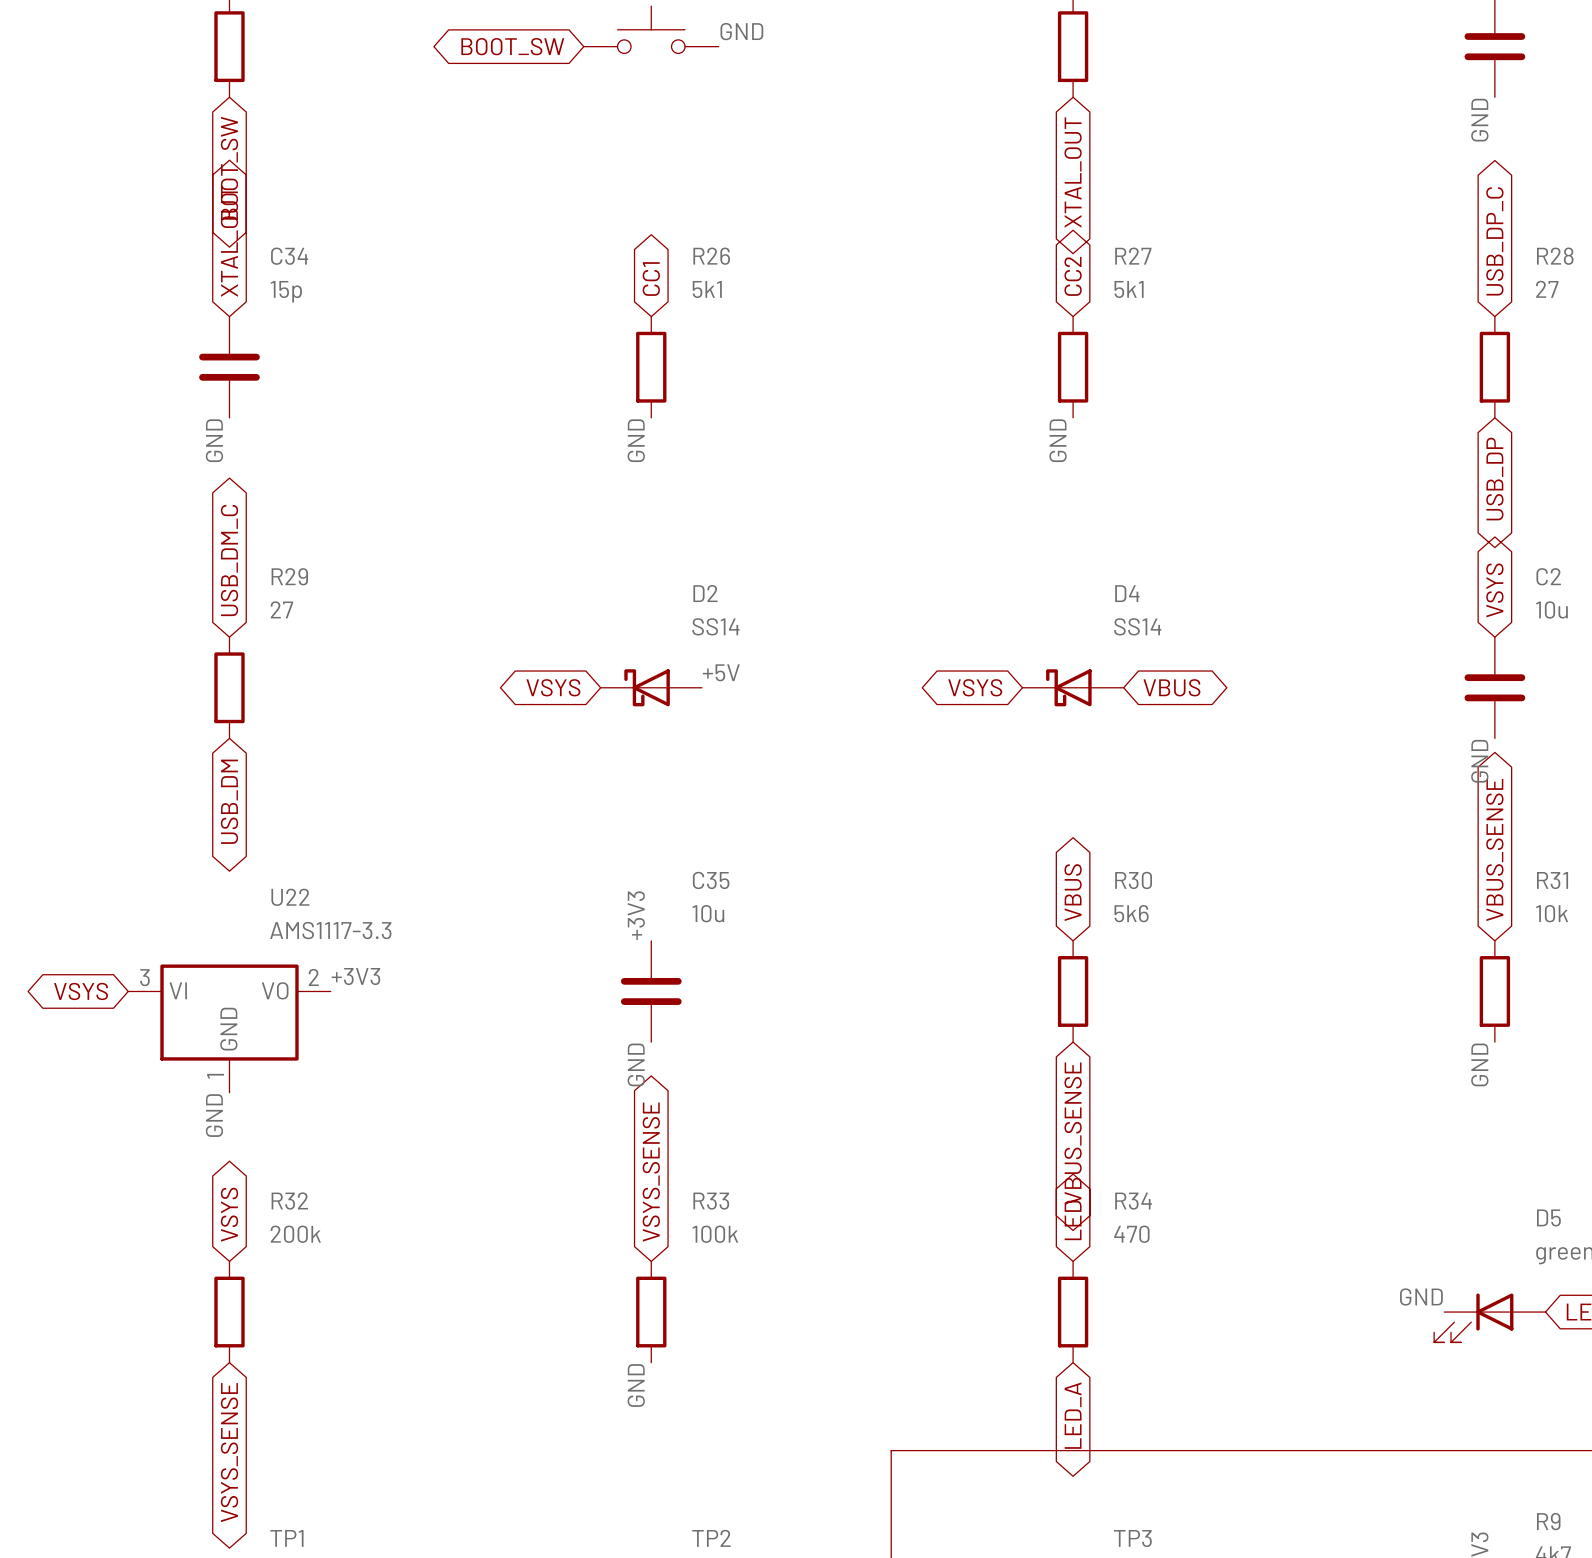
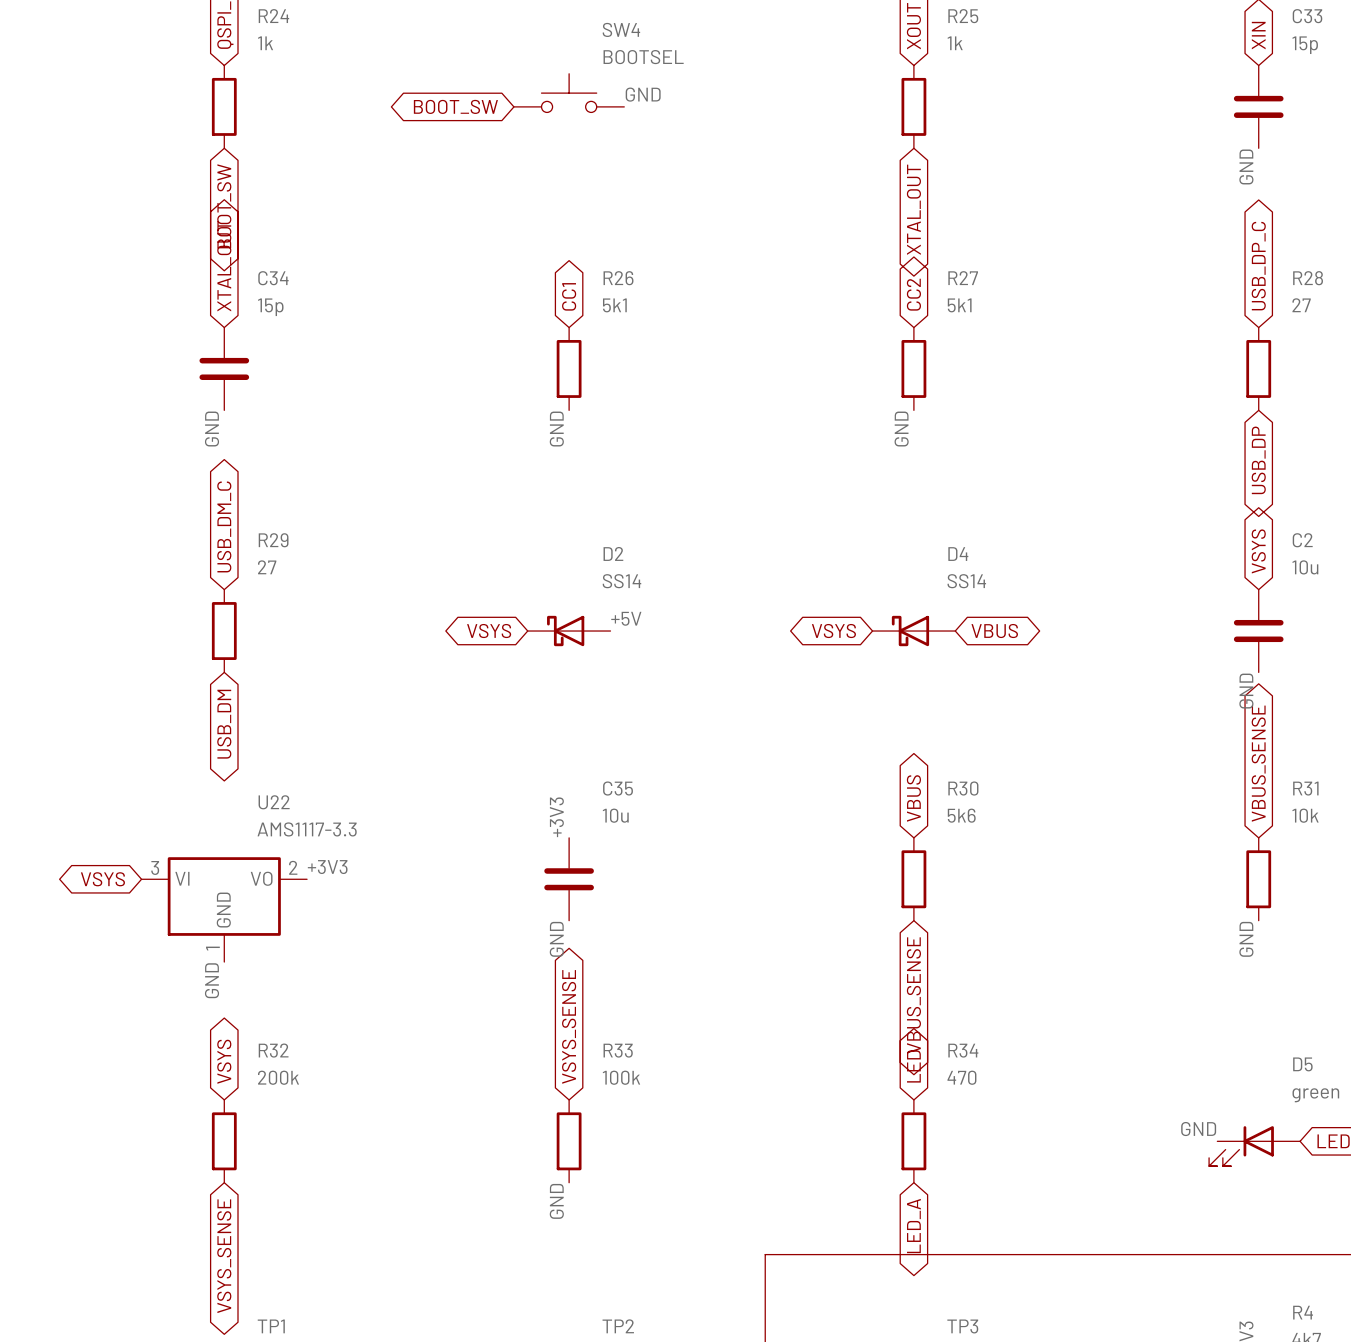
R9 name: R9 (1548, 1521) -> R4 (1303, 1312)

